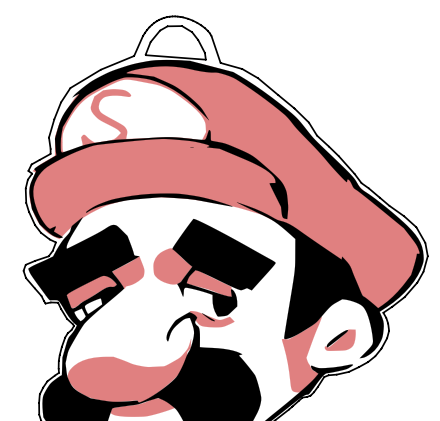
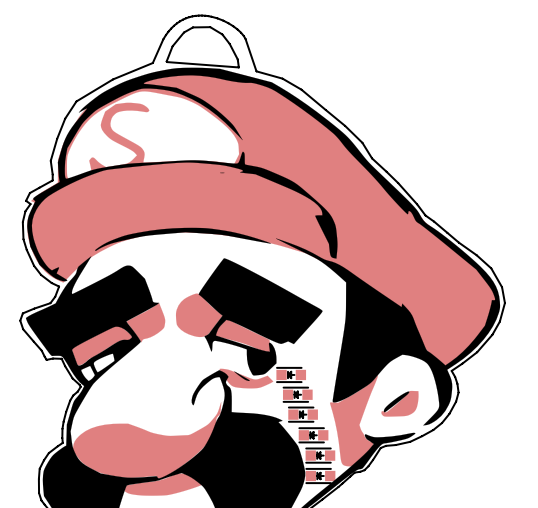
part: none -> (291, 374)
part: none -> (297, 394)
part: none -> (302, 414)
part: none -> (313, 435)
part: none -> (320, 455)
part: none -> (320, 476)

